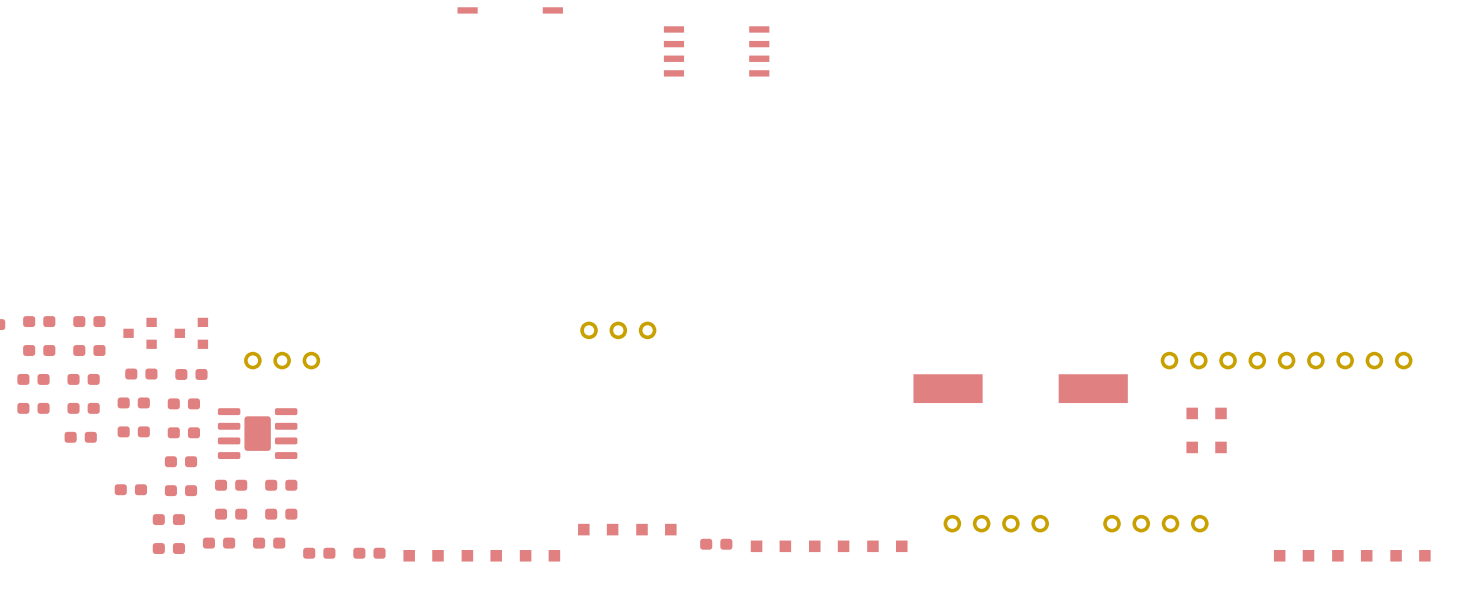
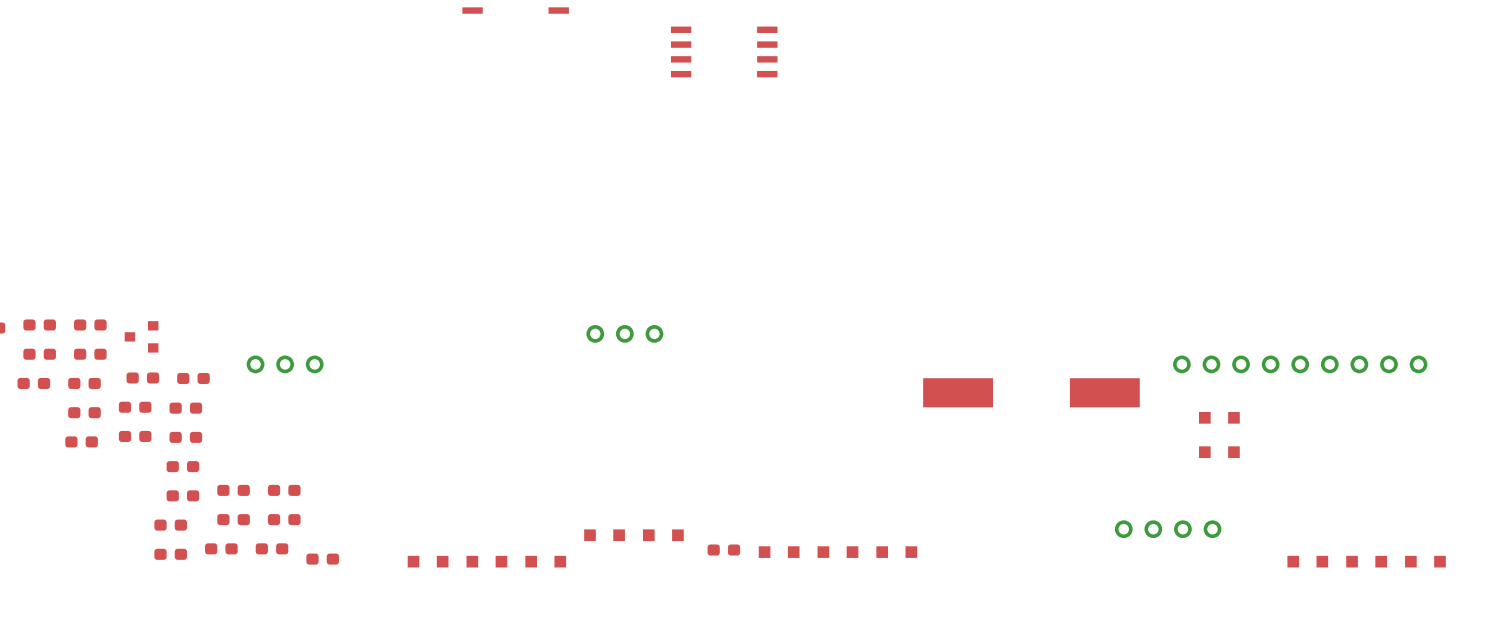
part: (191, 333) -> none
part: (33, 408) -> none
part: (257, 433) -> none
part: (130, 489) -> none
part: (996, 523) -> none
part: (369, 553) -> none

